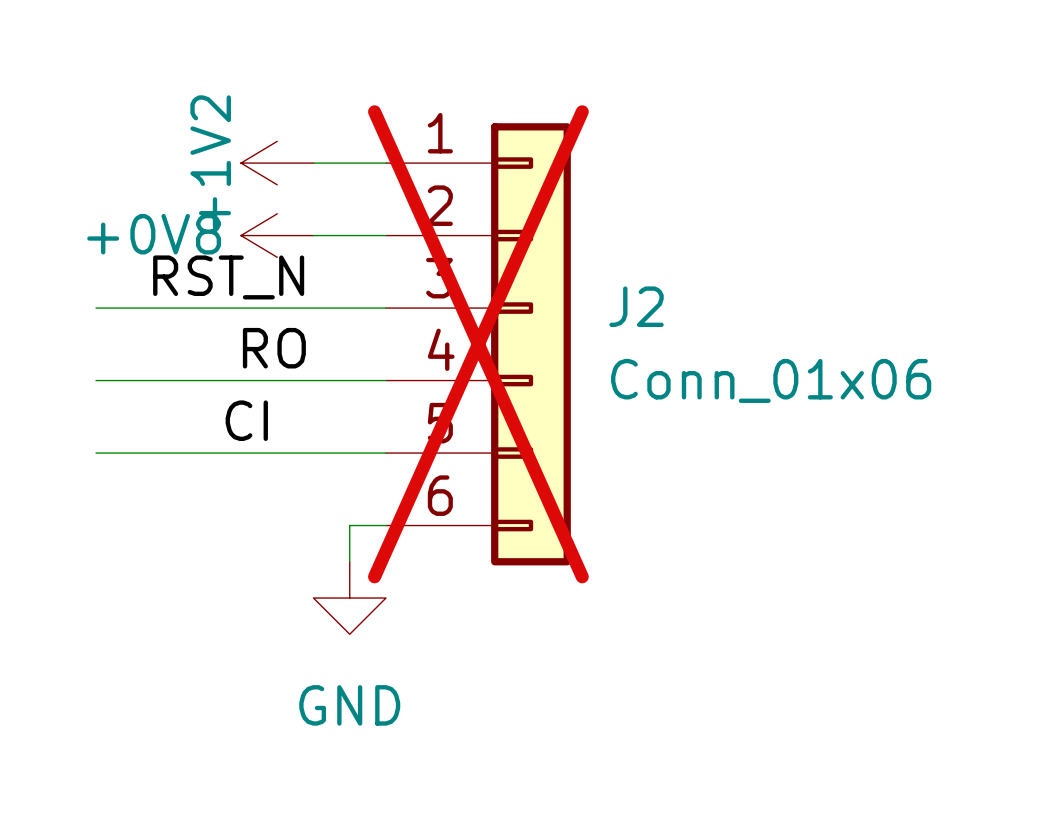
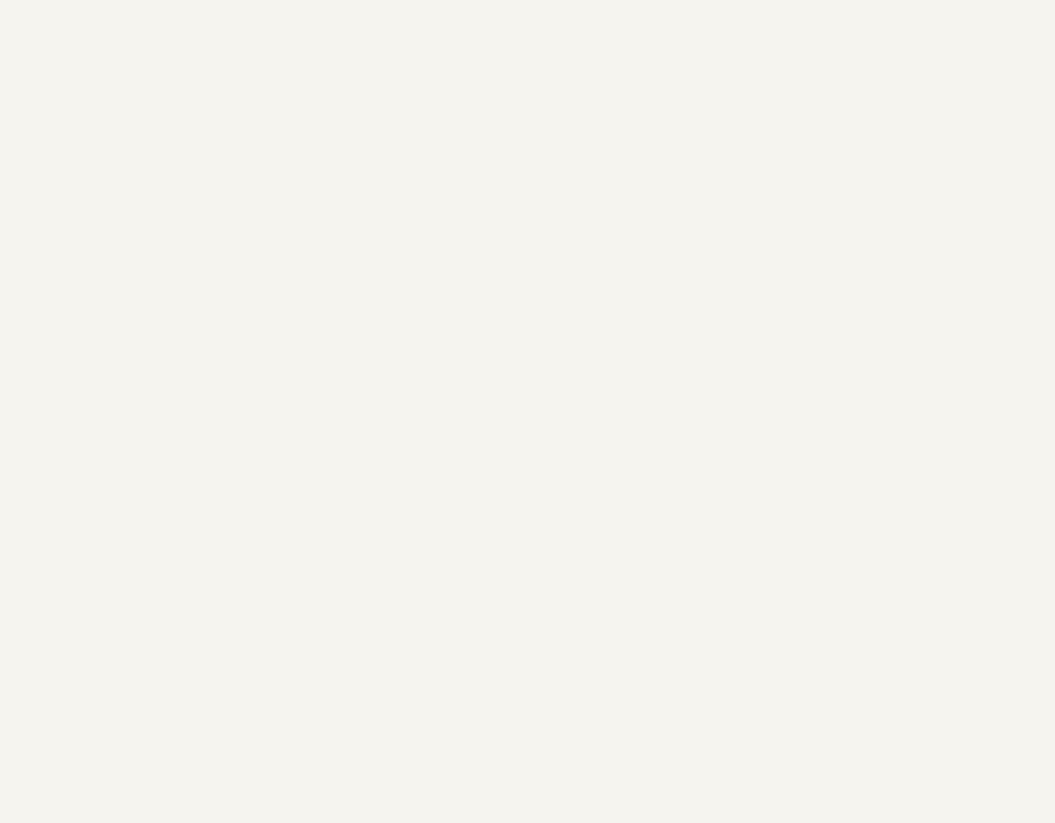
power symbol: +1V2 (277, 163) -> none
wire: (313, 163) (385, 163) -> none
power symbol: +0V8 (277, 235) -> none
wire: (313, 235) (385, 235) -> none
label: RST_N (228, 277) -> none
wire: (96, 308) (385, 308) -> none
J2: Conn_01x06 (478, 344) -> none
label: RO (274, 348) -> none
wire: (96, 380) (385, 380) -> none
label: CI (246, 420) -> none
wire: (96, 453) (385, 453) -> none
wire: (385, 525) (349, 525) (349, 561) -> none
power symbol: GND (349, 598) -> none

